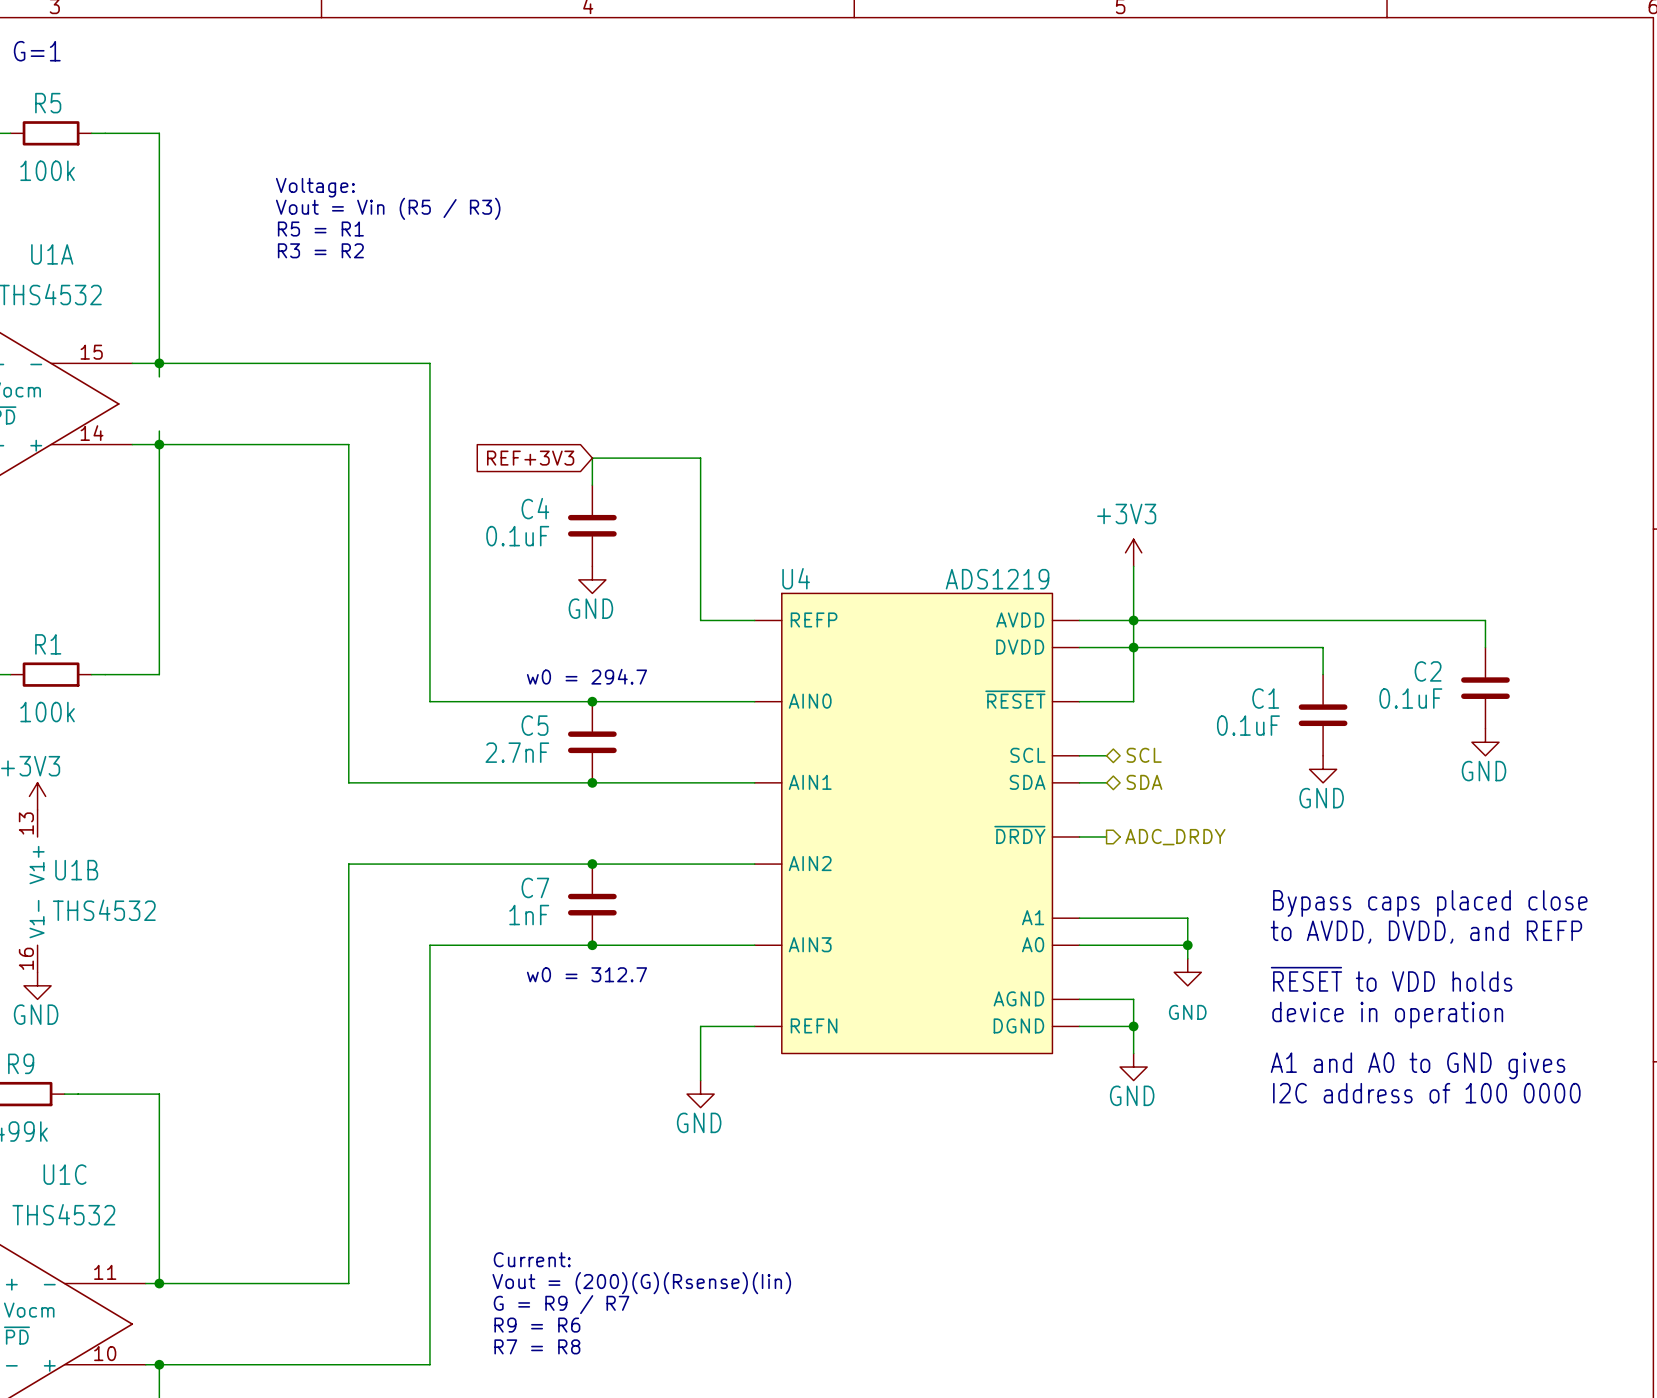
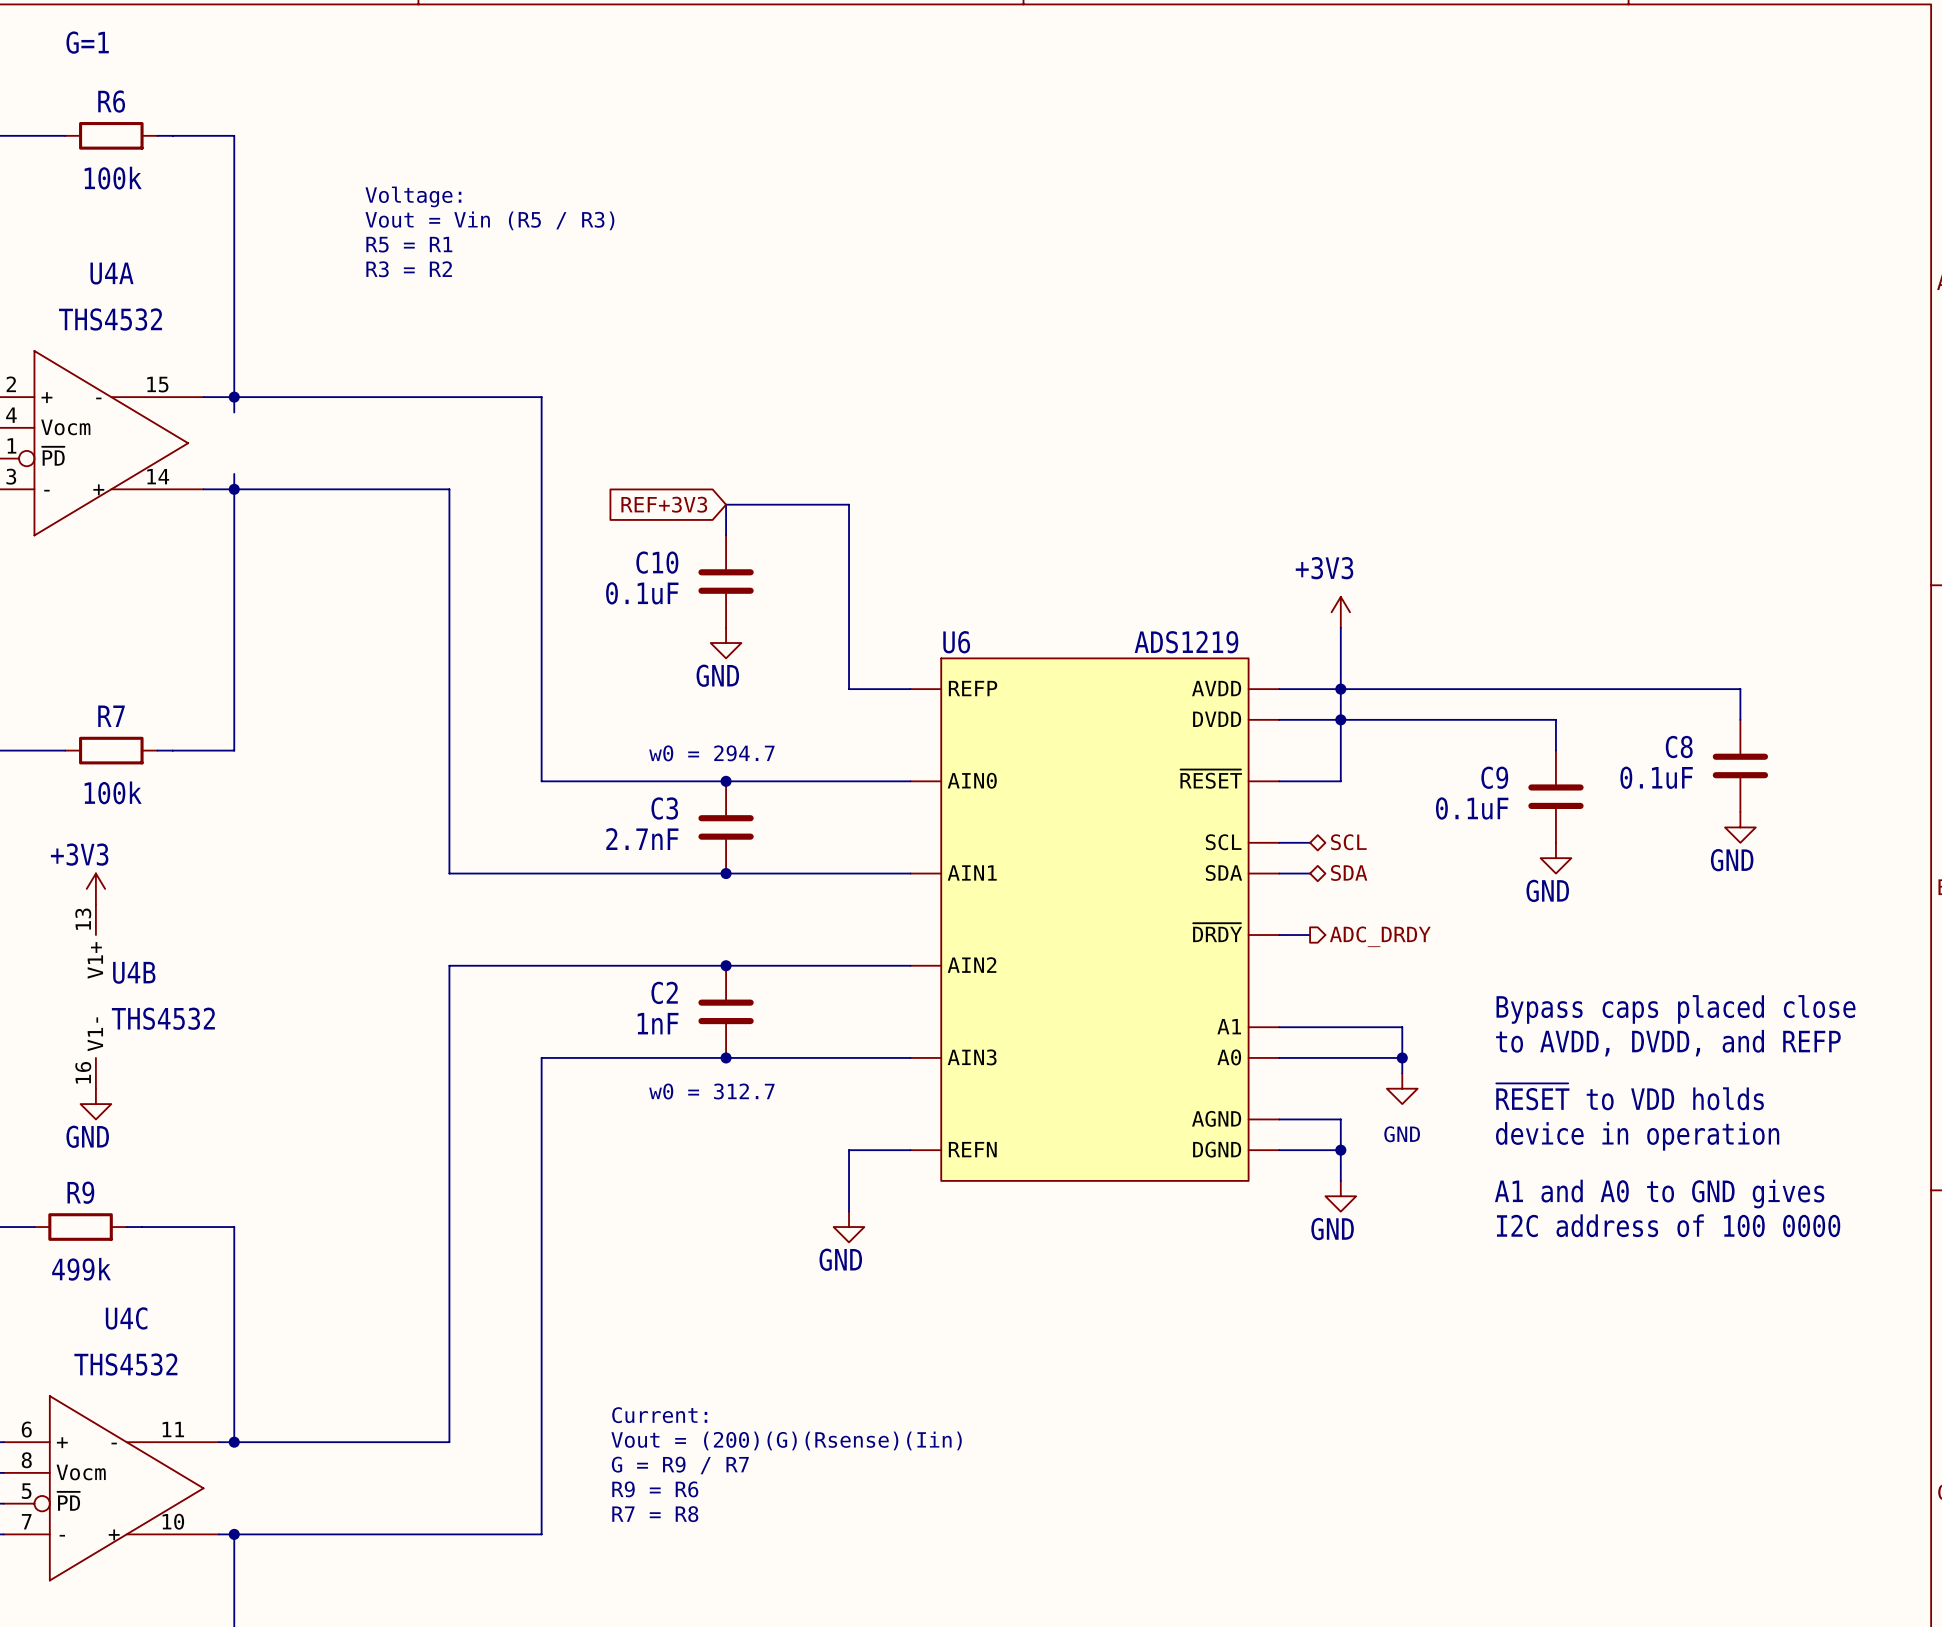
R5 name: R5 (48, 103) -> R6 (111, 101)
U1A name: U1A (52, 254) -> U4A (111, 273)
C4 name: C4 (535, 508) -> C10 (657, 562)
U4 name: U4 (796, 578) -> U6 (956, 642)
R1 name: R1 (48, 644) -> R7 (111, 716)
C2 name: C2 (1428, 671) -> C8 (1679, 747)
C1 name: C1 (1265, 698) -> C9 (1494, 777)
C5 name: C5 (534, 725) -> C3 (664, 808)
U1B name: U1B (76, 870) -> U4B (134, 972)
C7 name: C7 (535, 887) -> C2 (664, 992)
U1C name: U1C (65, 1174) -> U4C (126, 1318)

